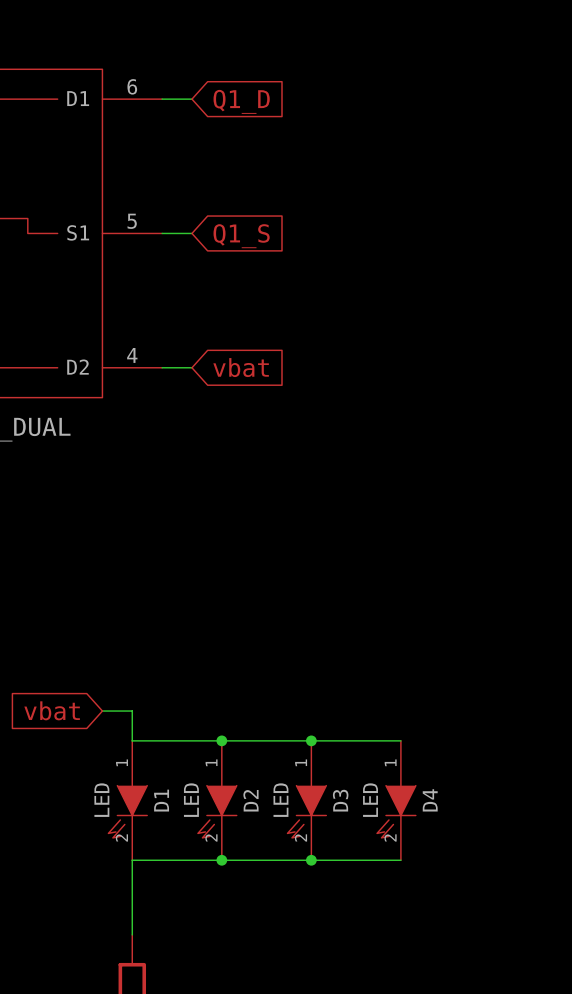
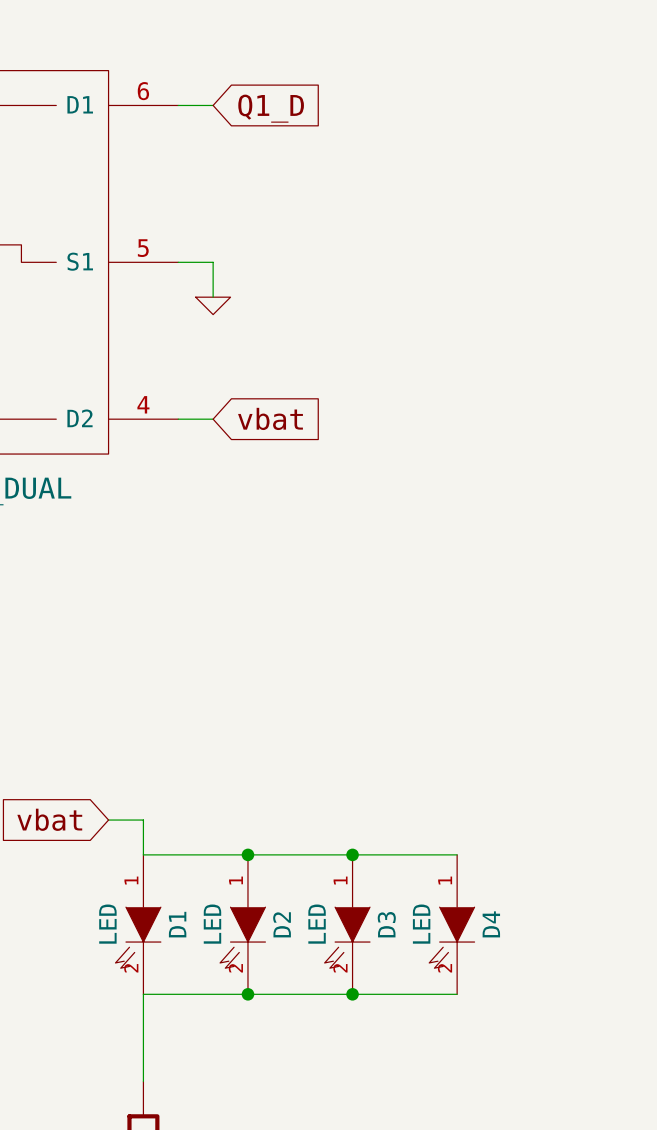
wire: none -> (213, 262) (213, 297)
global label: Q1_S (241, 236) -> none
power symbol: none -> (213, 305)

